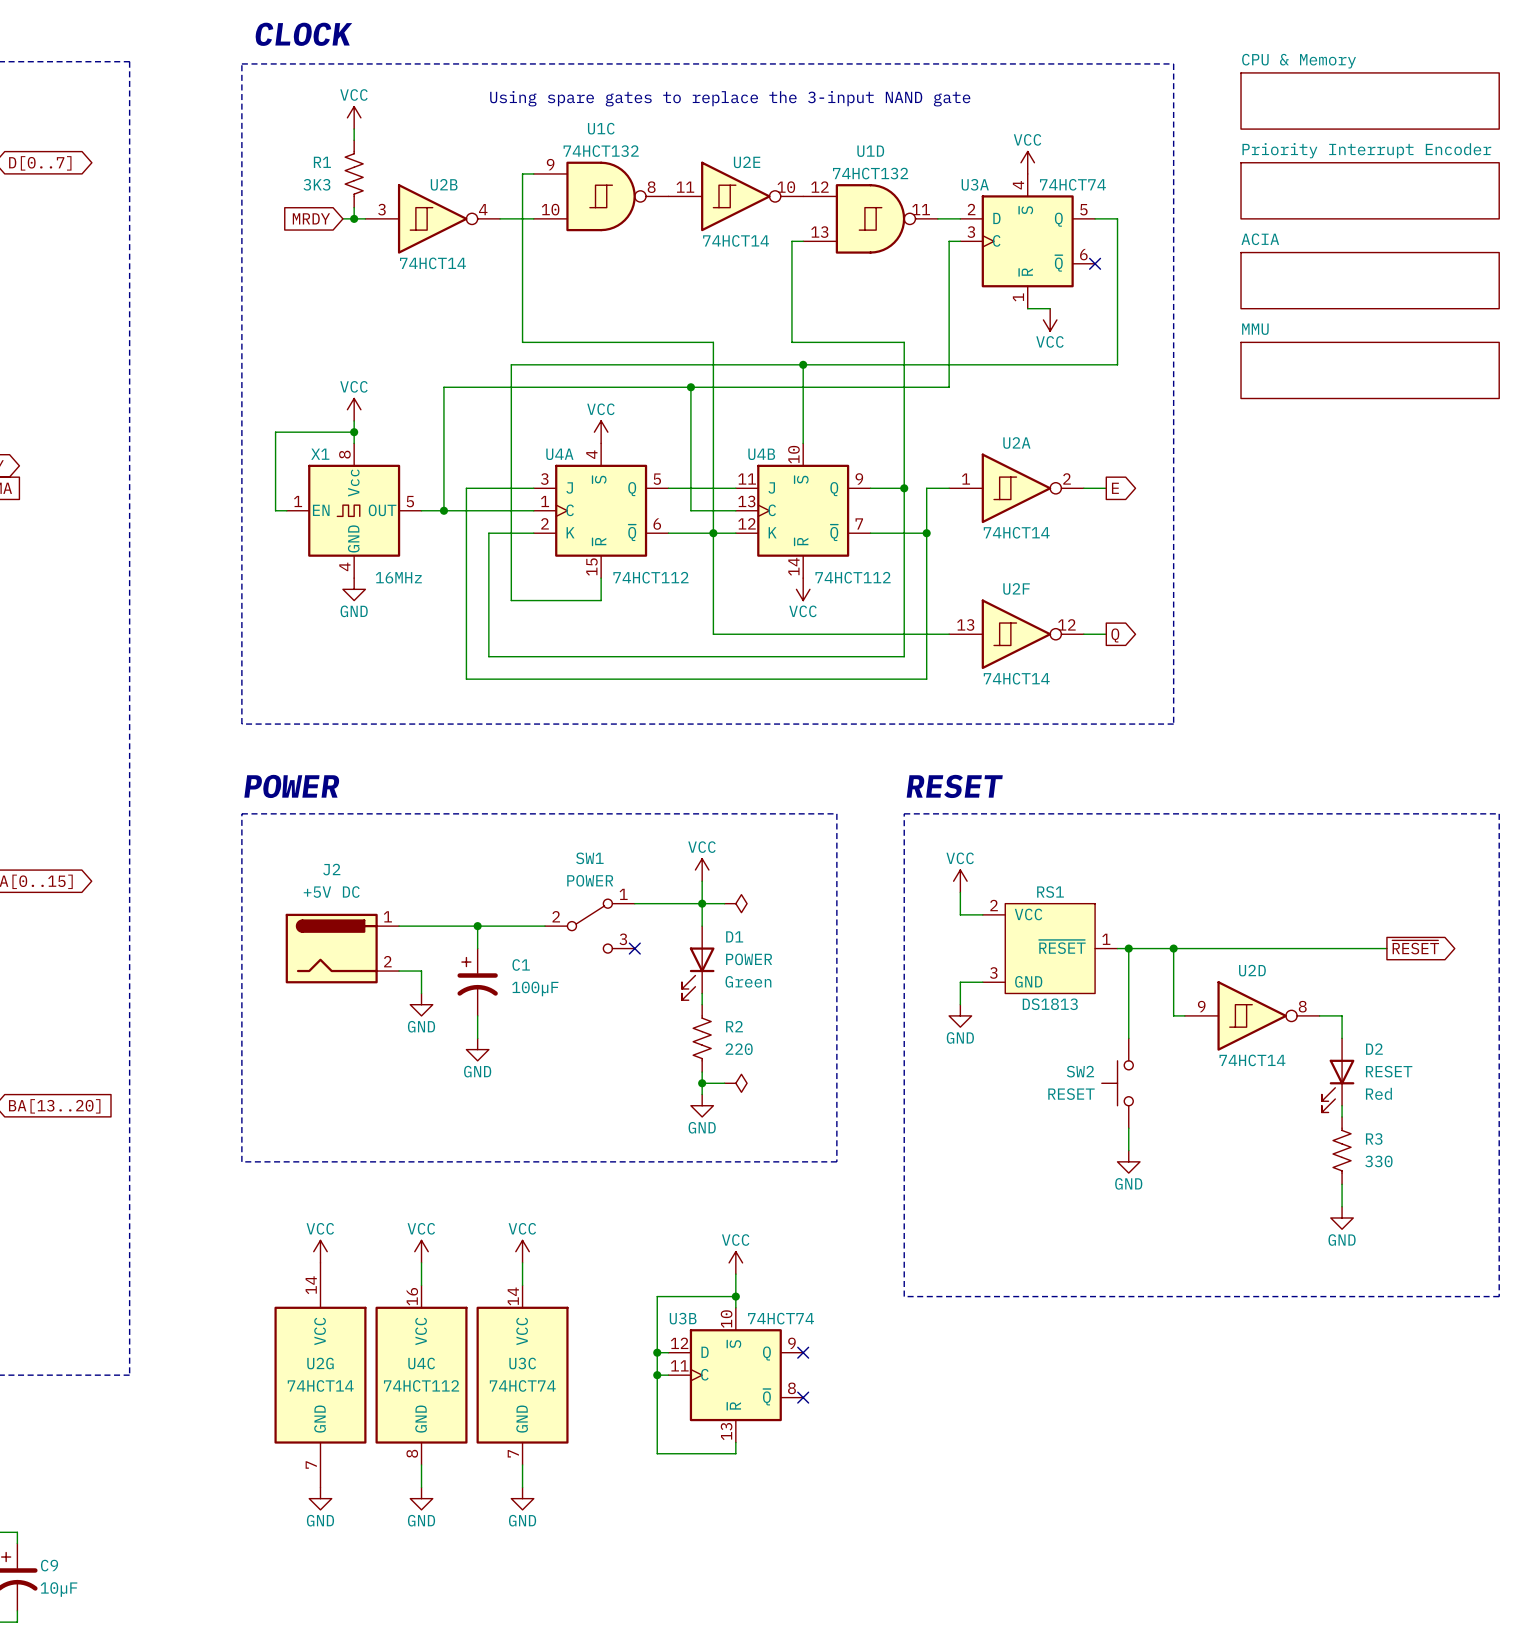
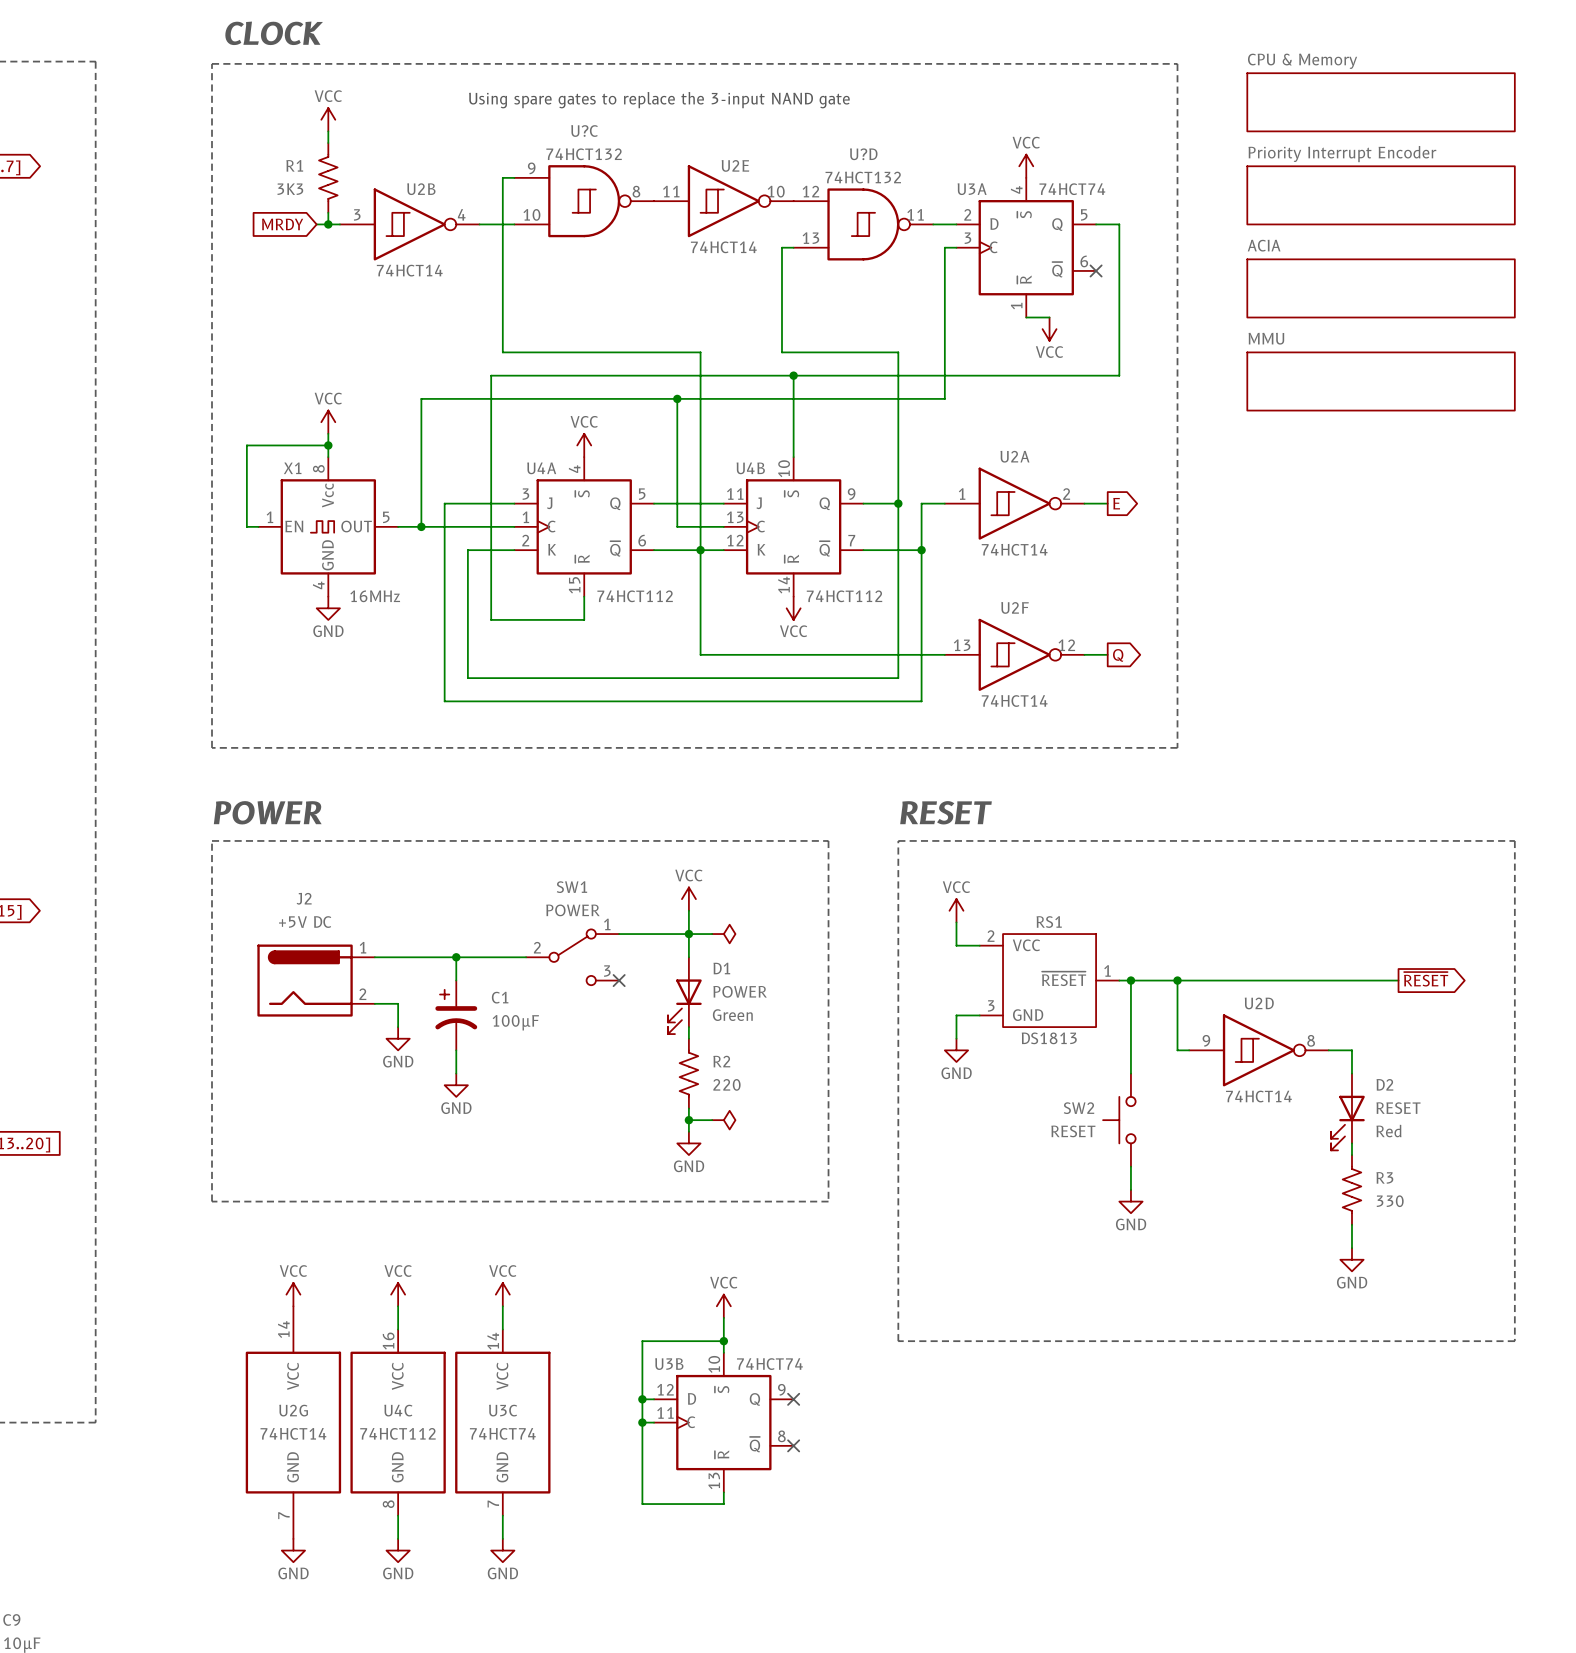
U1C name: U1C (601, 128) -> U?C (584, 131)
U1D name: U1D (870, 151) -> U?D (863, 154)

